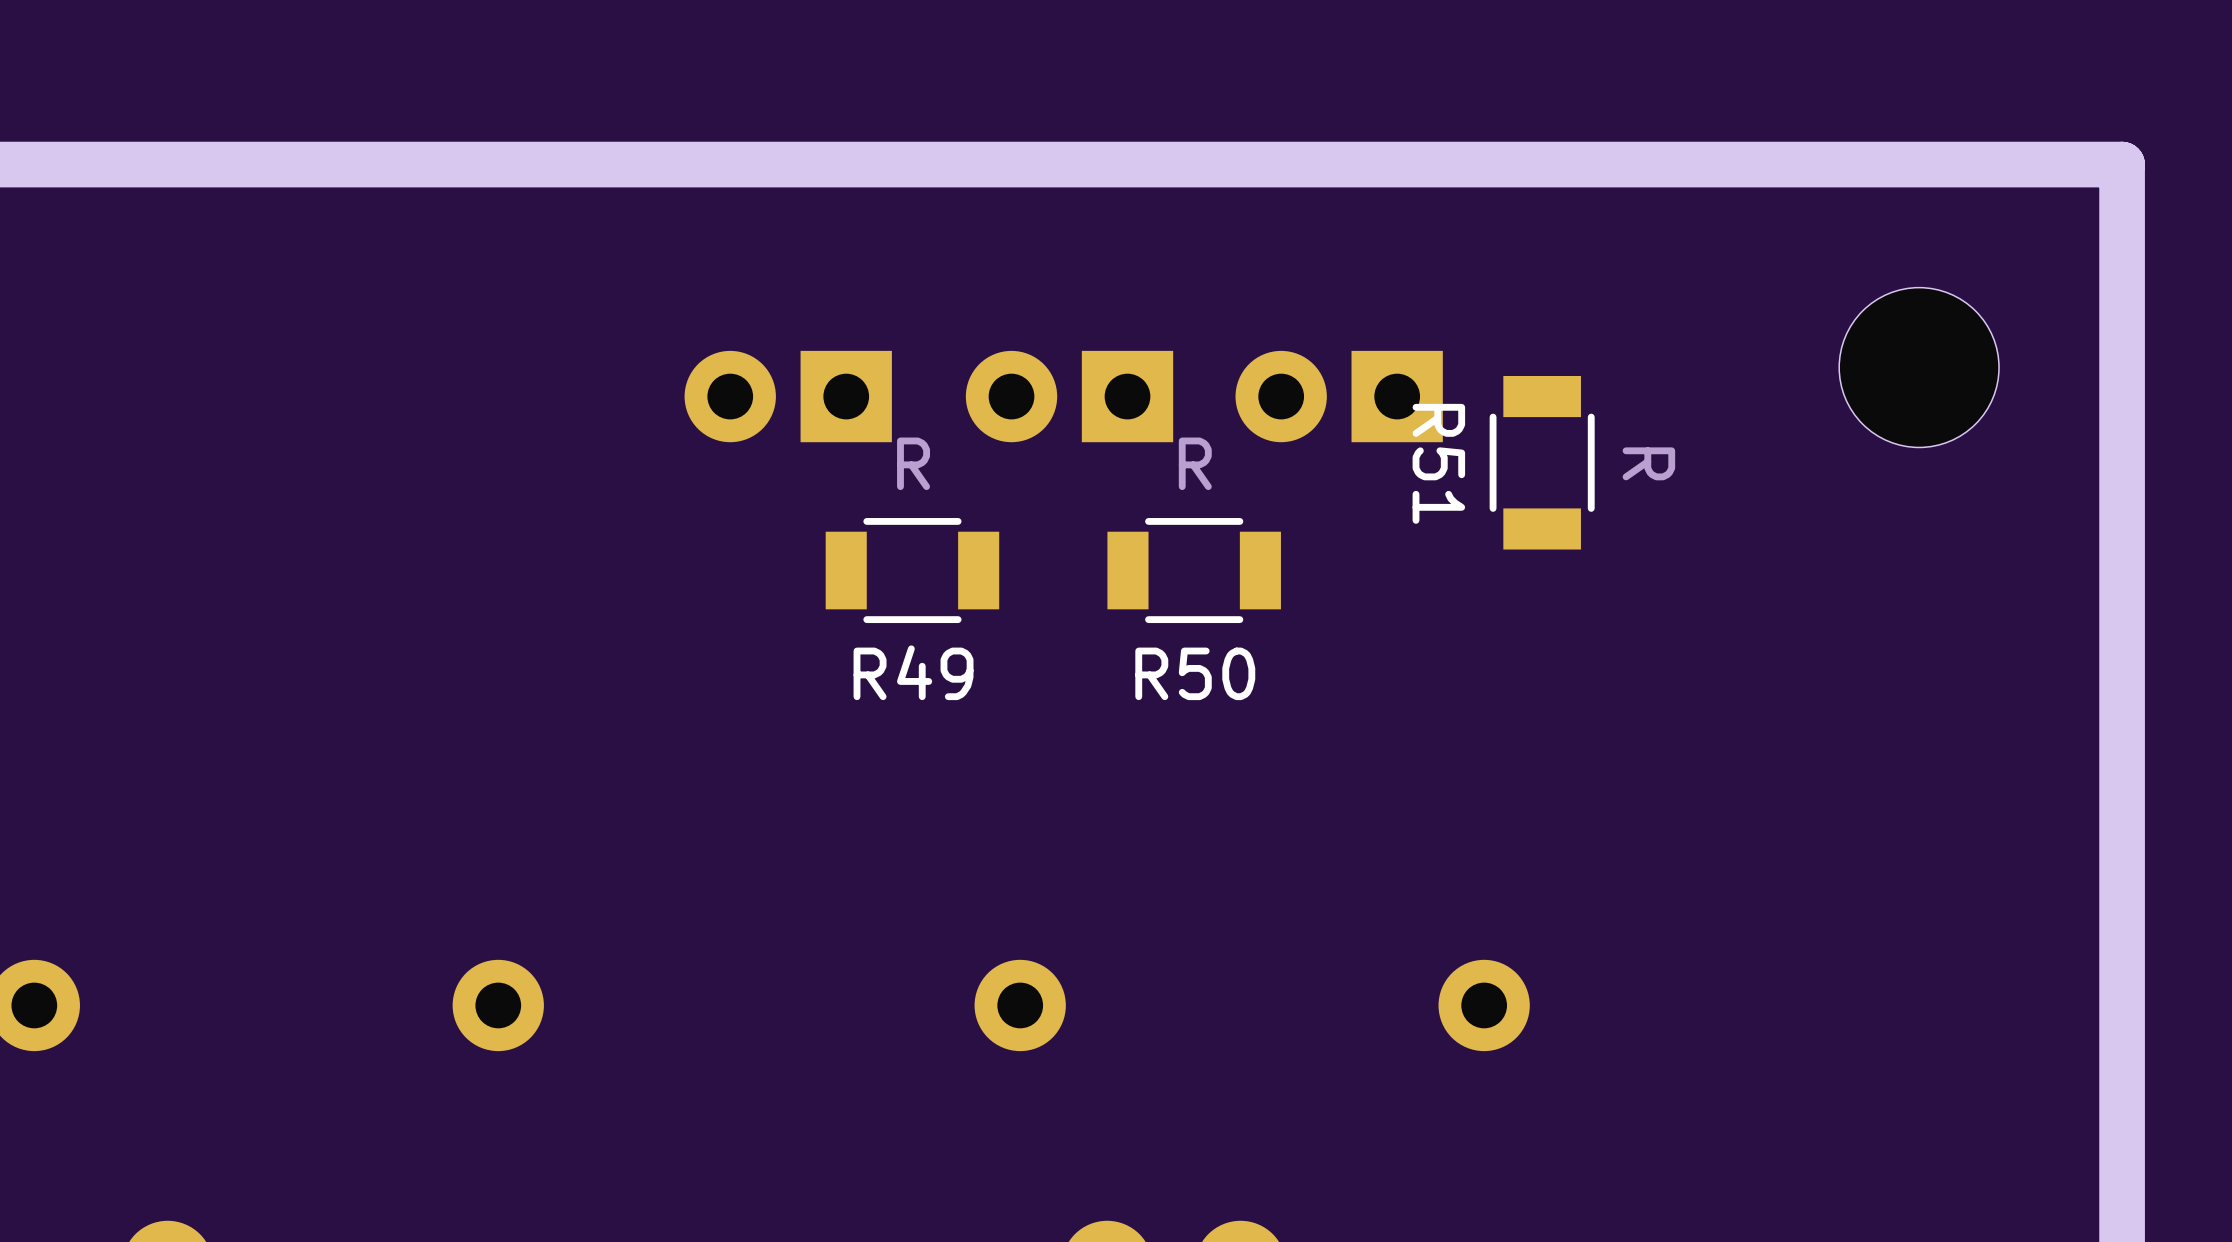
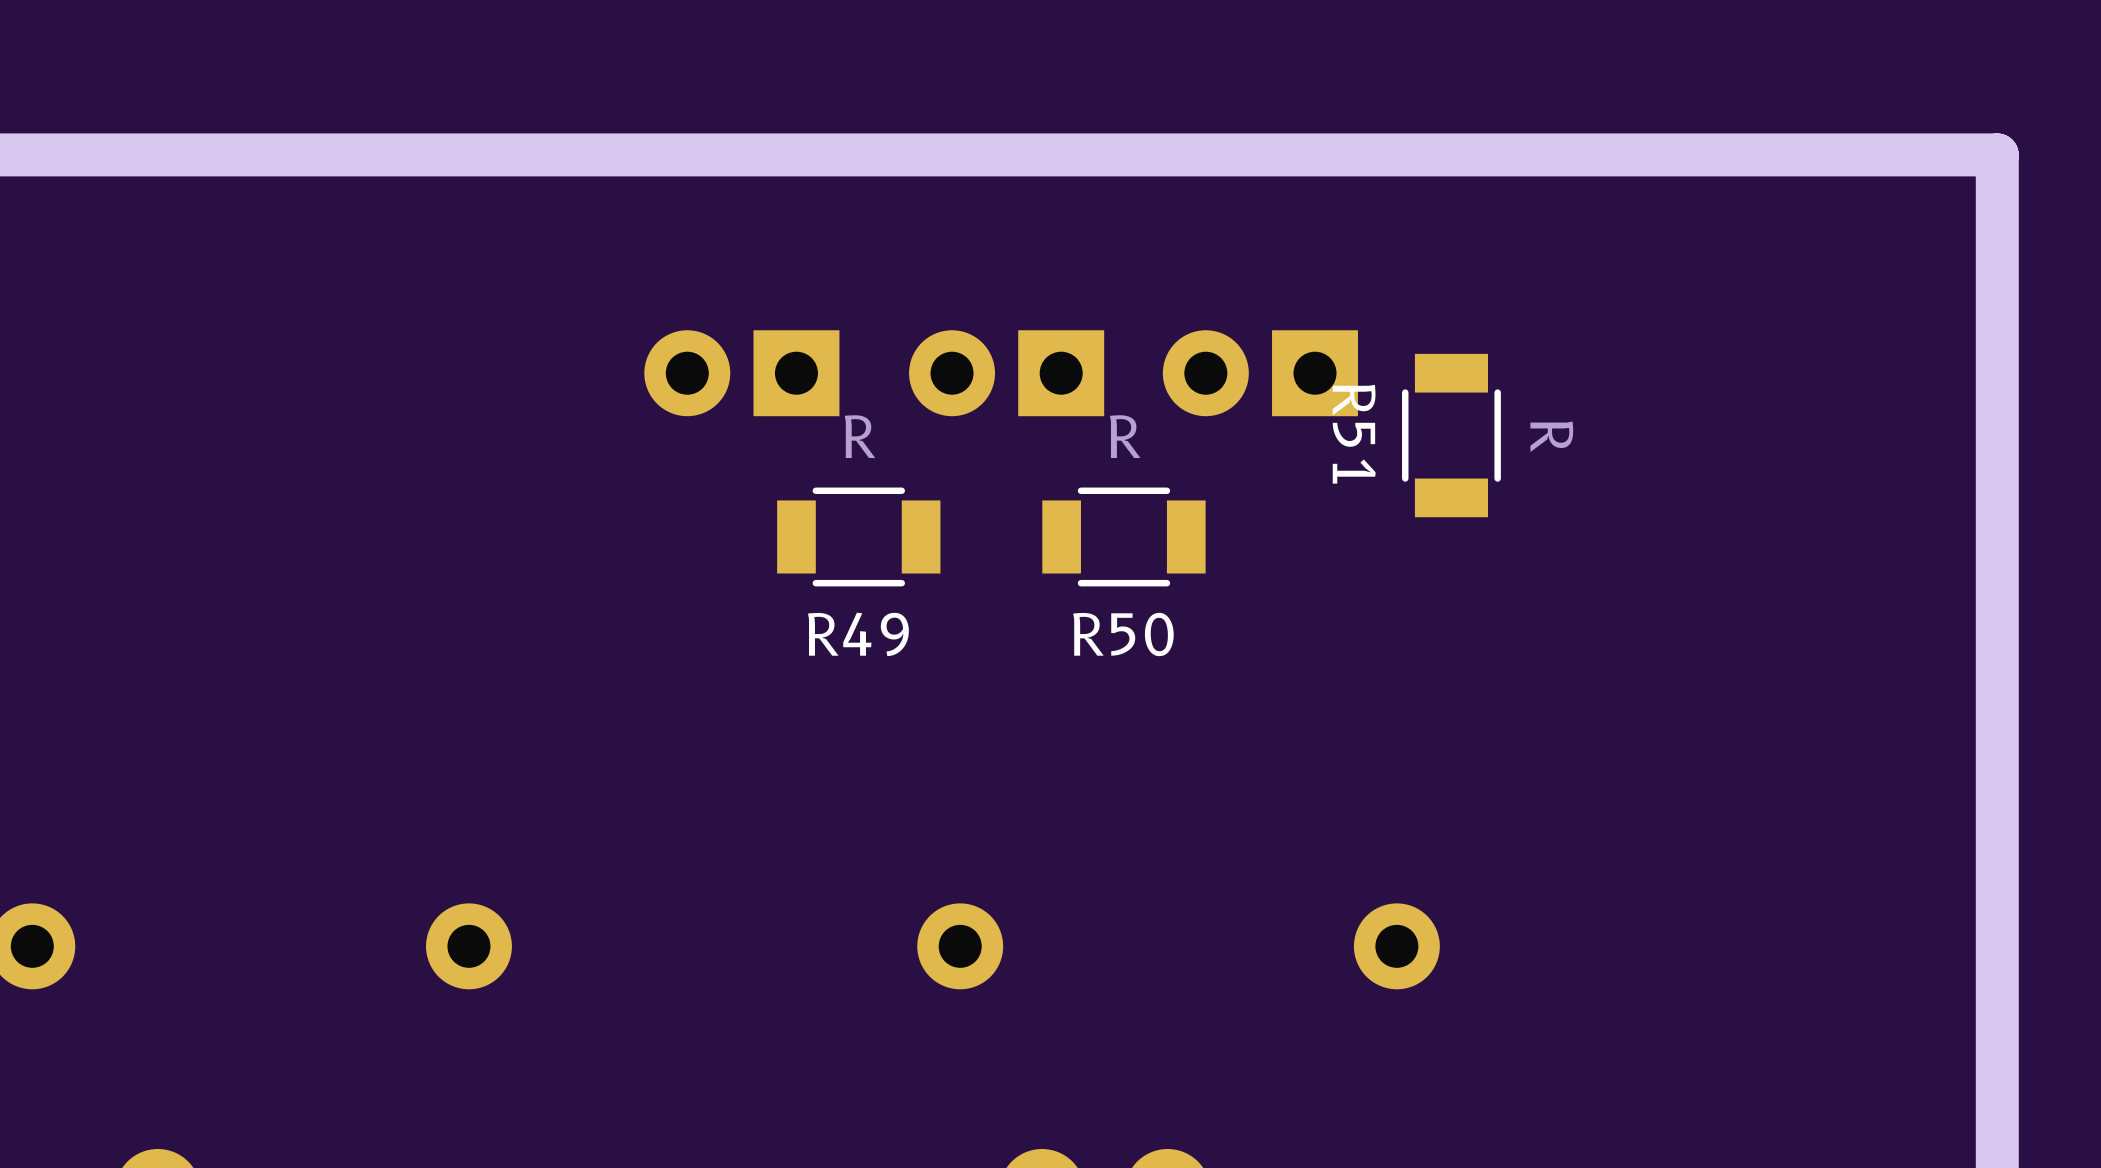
part: (1919, 367) -> none

